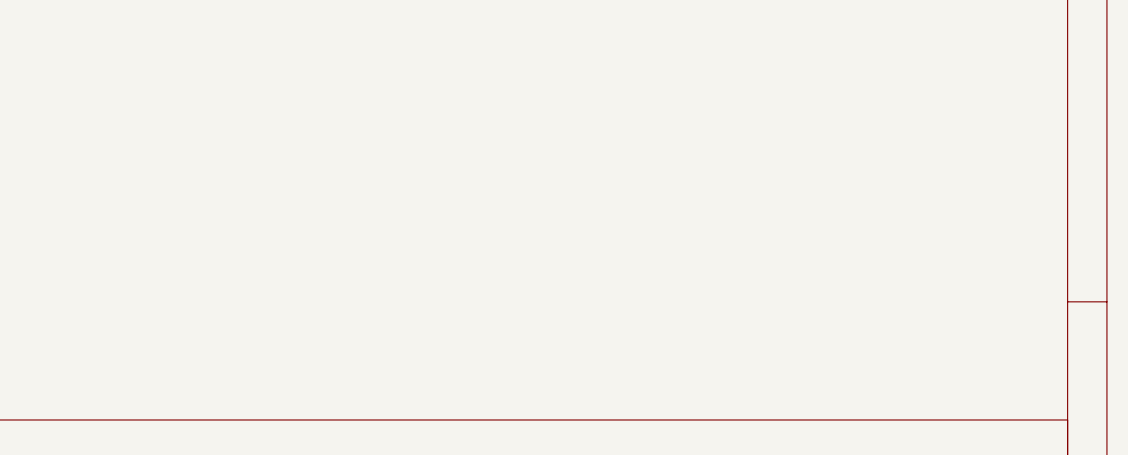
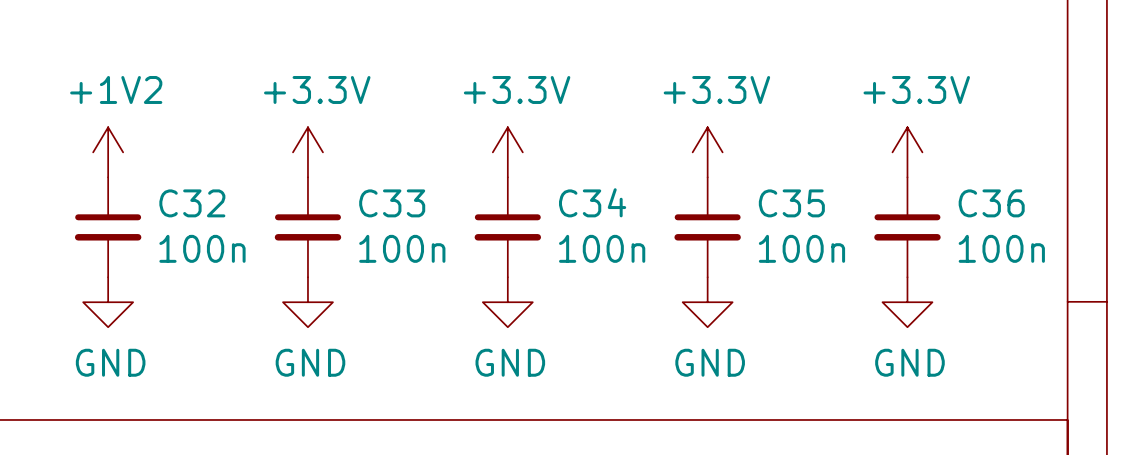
power symbol: none -> +1V2 (108, 152)
power symbol: none -> +3.3V (307, 152)
power symbol: none -> +3.3V (507, 152)
power symbol: none -> +3.3V (707, 152)
power symbol: none -> +3.3V (907, 152)
C32: none -> 100n (108, 227)
C33: none -> 100n (307, 227)
C34: none -> 100n (507, 227)
C35: none -> 100n (707, 227)
C36: none -> 100n (907, 227)
power symbol: none -> GND (108, 302)
power symbol: none -> GND (307, 302)
power symbol: none -> GND (507, 302)
power symbol: none -> GND (707, 302)
power symbol: none -> GND (907, 302)

